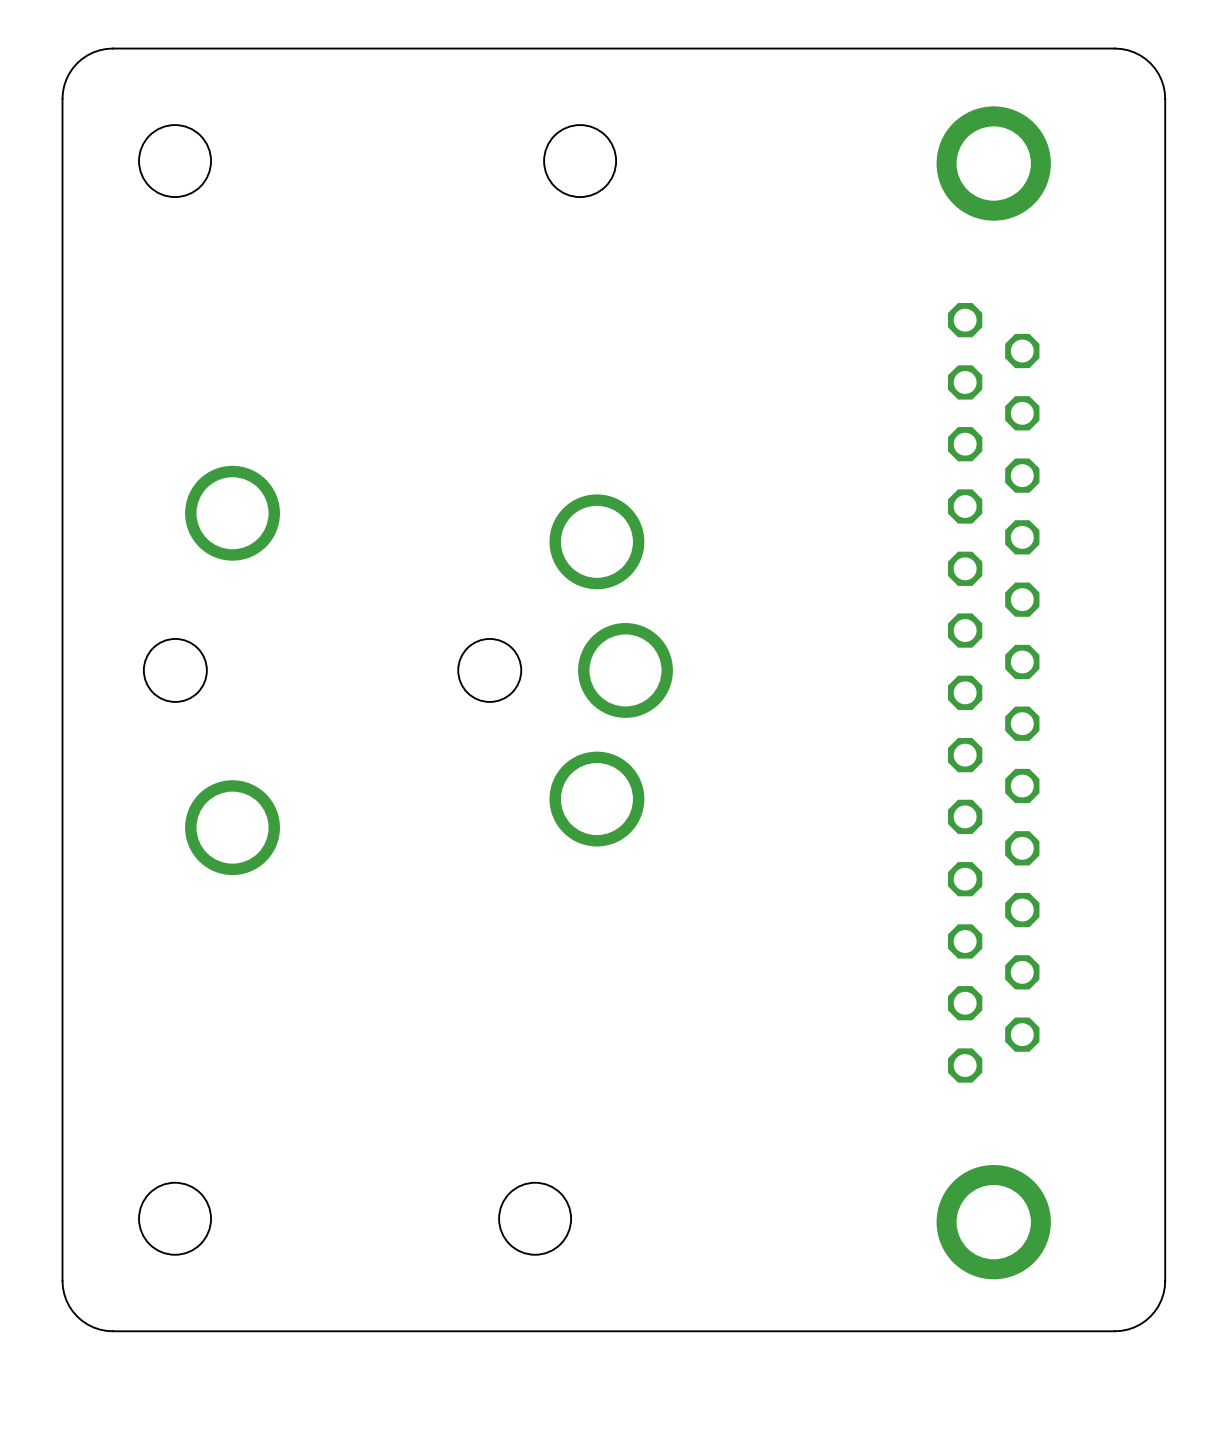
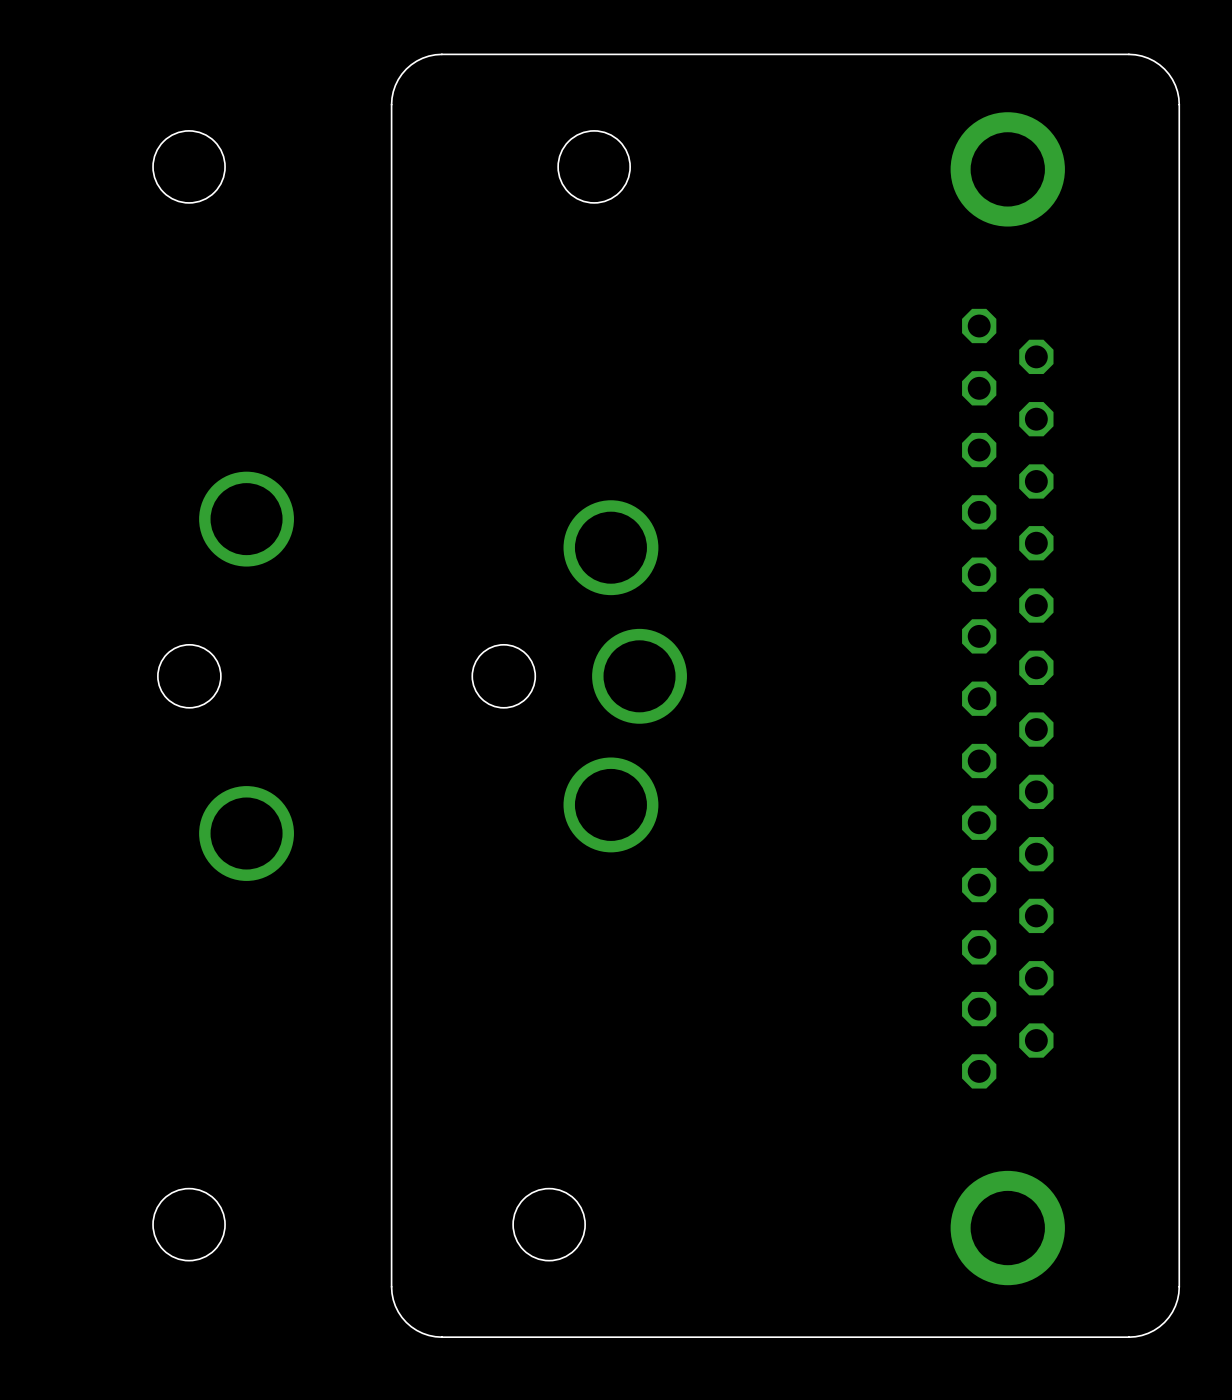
board edge: (427, 48) (106, 48) (93, 52) (77, 63) (66, 79) (62, 98) (62, 1280) (64, 1293) (69, 1306) (77, 1316) (93, 1327) (106, 1330) (427, 1331) -> (441, 54) (422, 58) (406, 69) (395, 85) (391, 104) (391, 1286) (395, 1306) (406, 1322) (422, 1333) (441, 1337)

